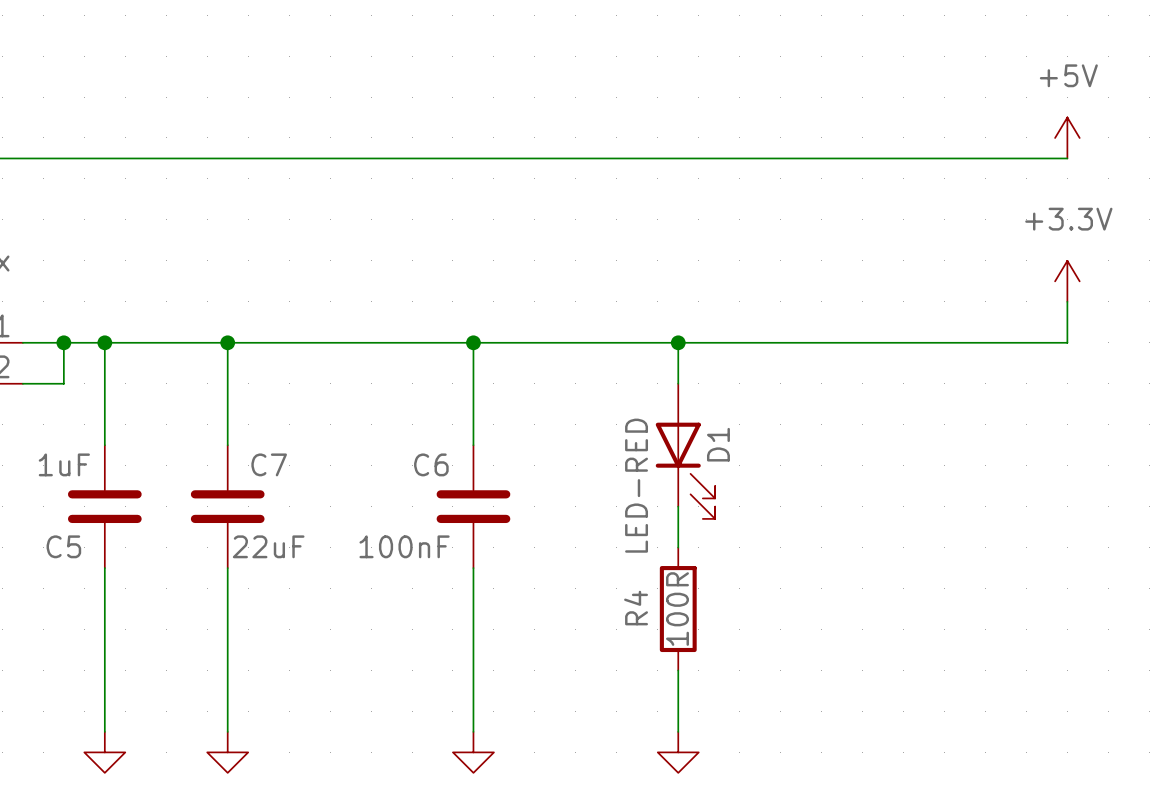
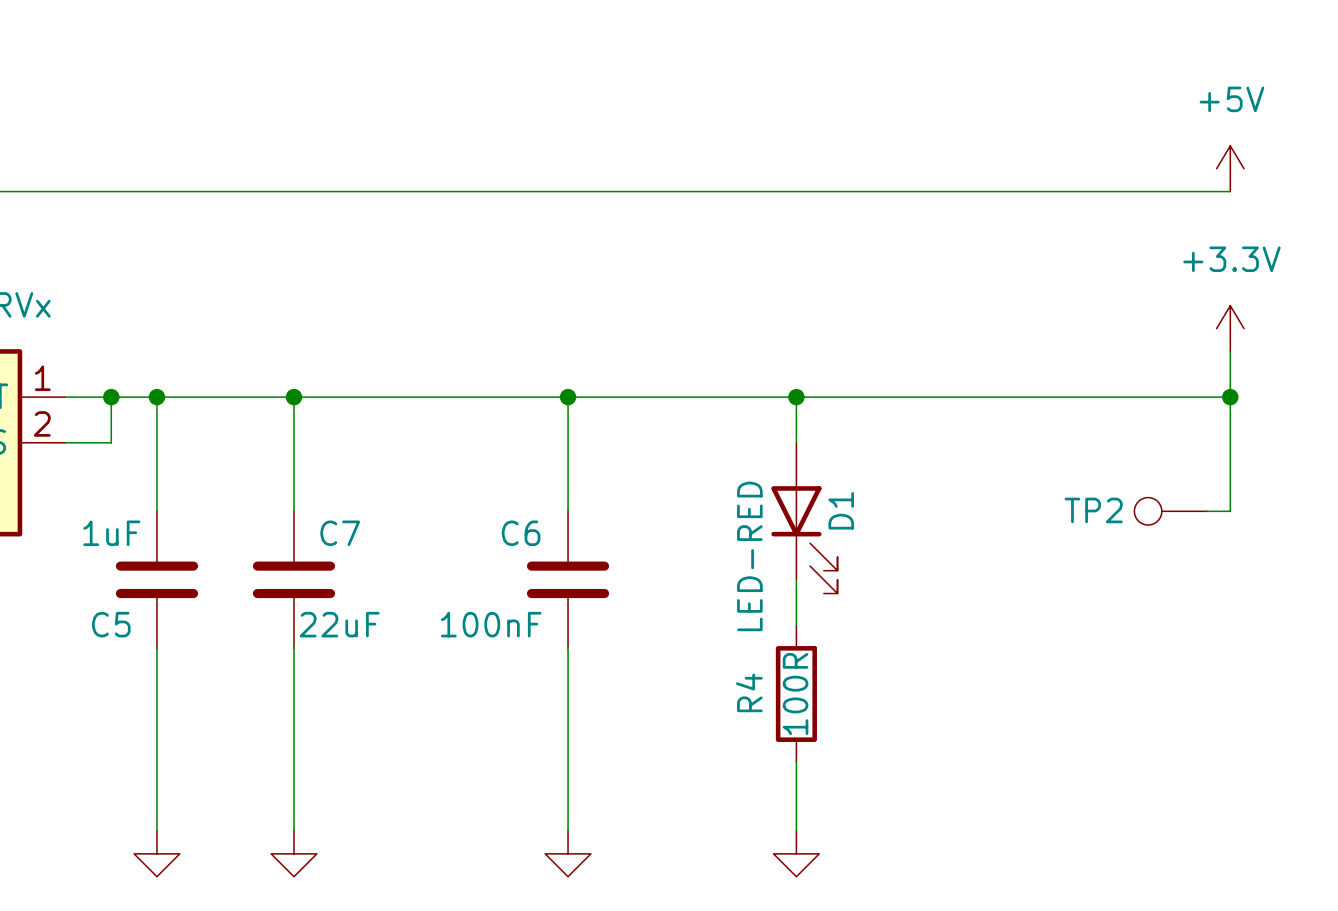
wire: none -> (1230, 397) (1230, 511) (1207, 511)
junction: none -> (1230, 397)
TP2: none -> (1170, 511)

